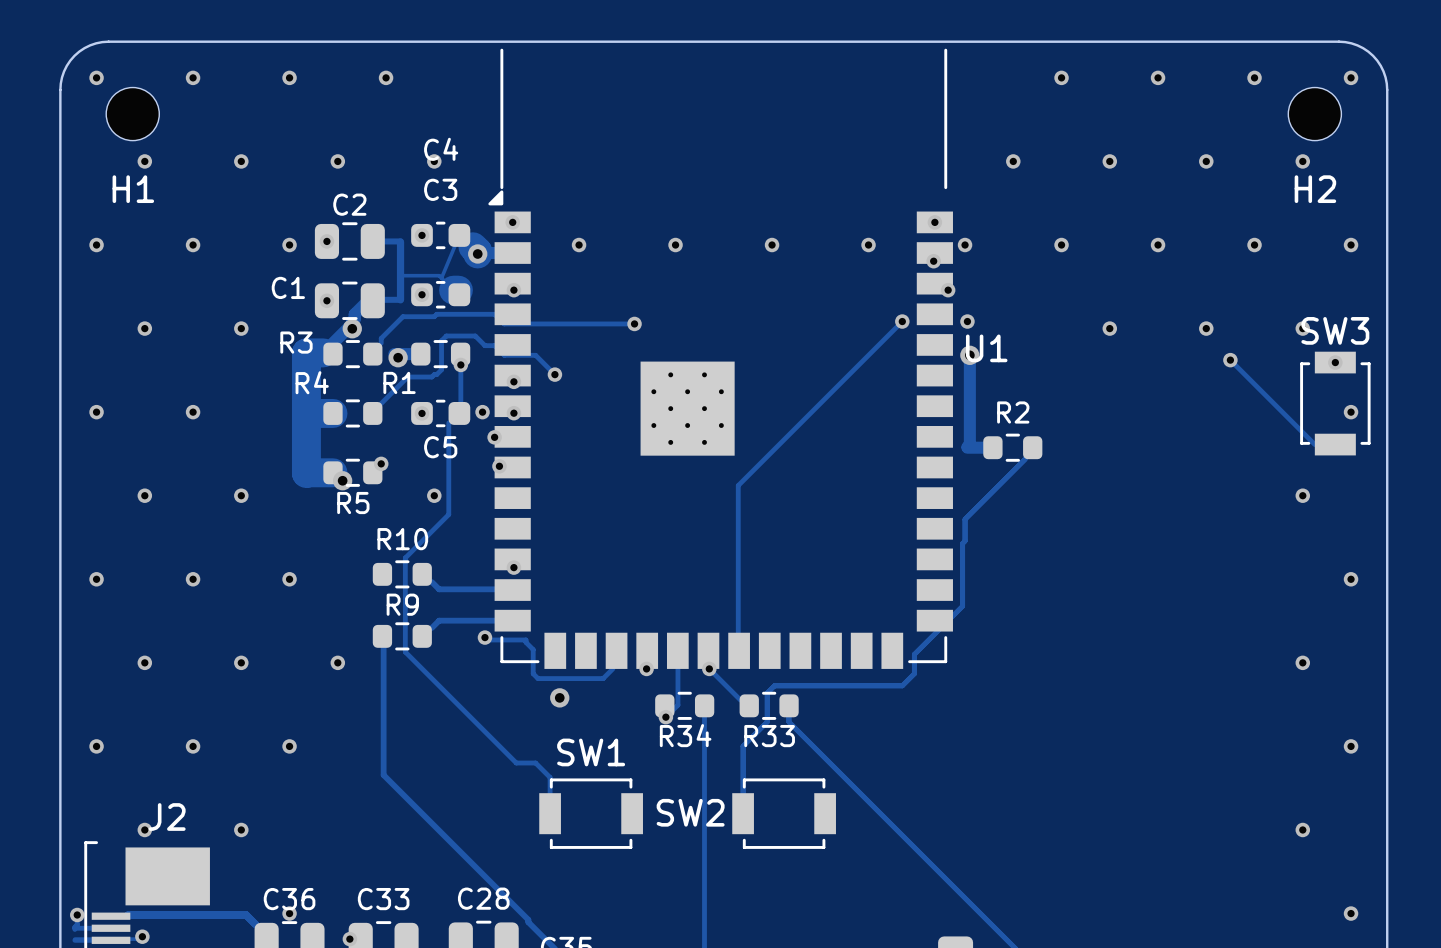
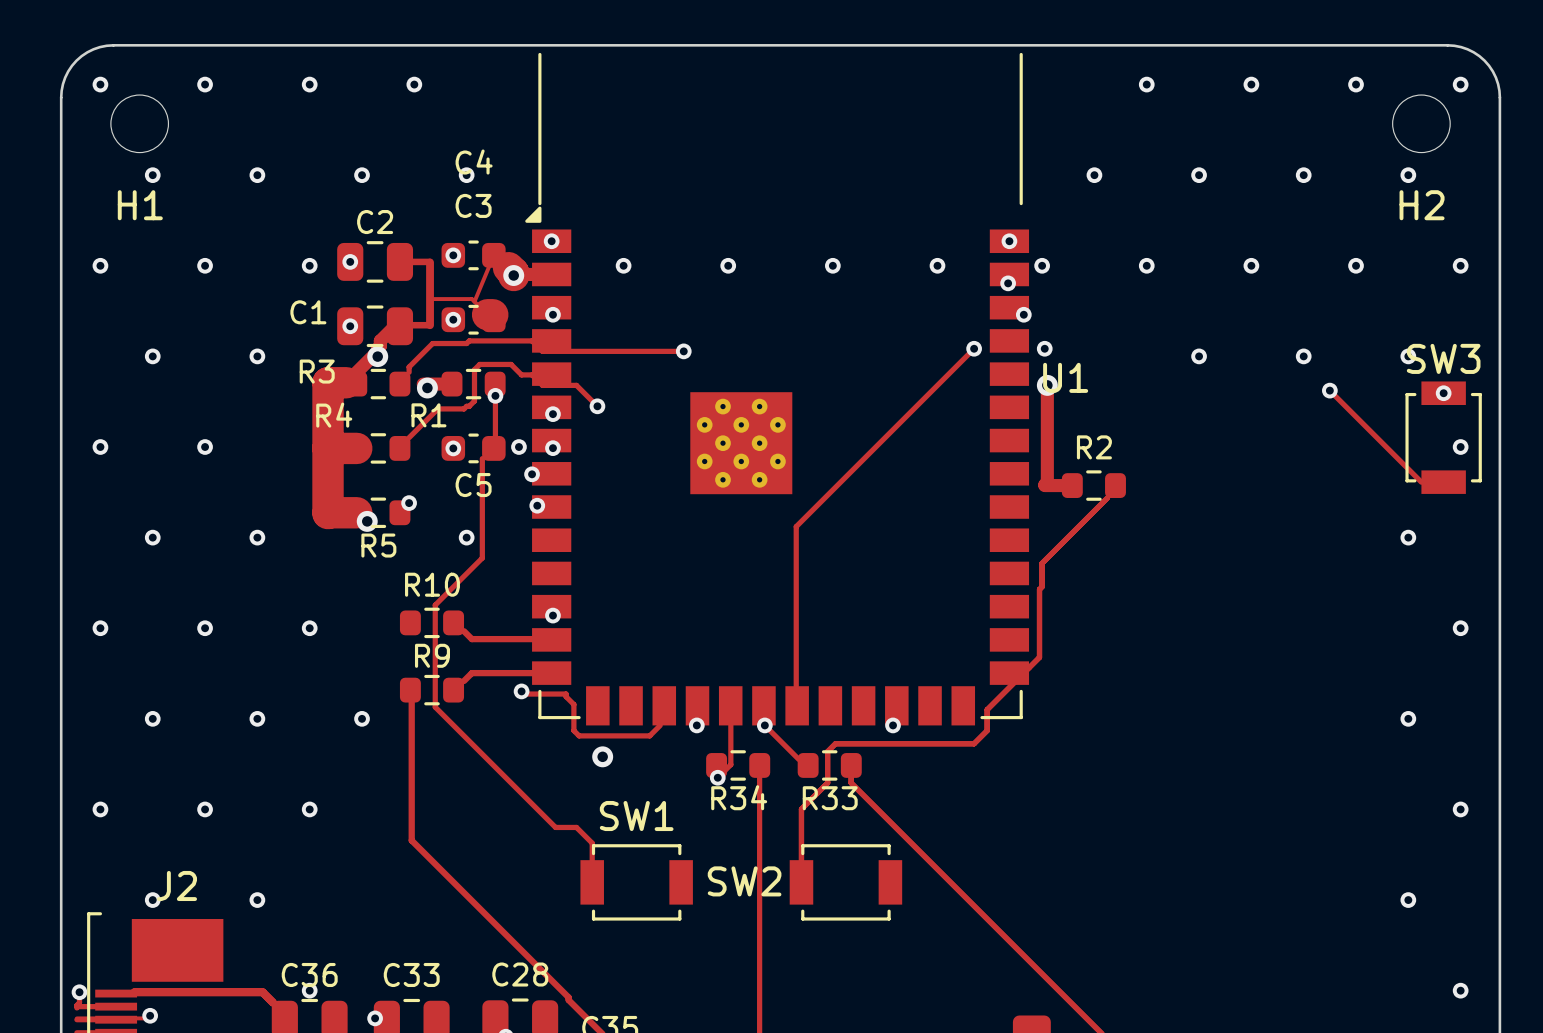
via: none -> (893, 725)

